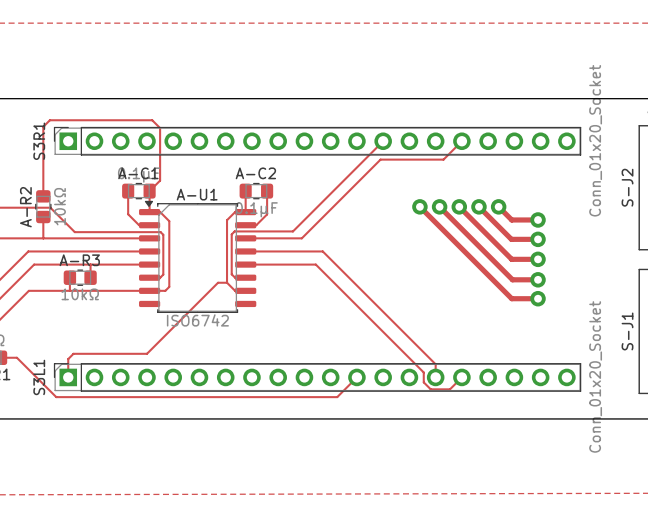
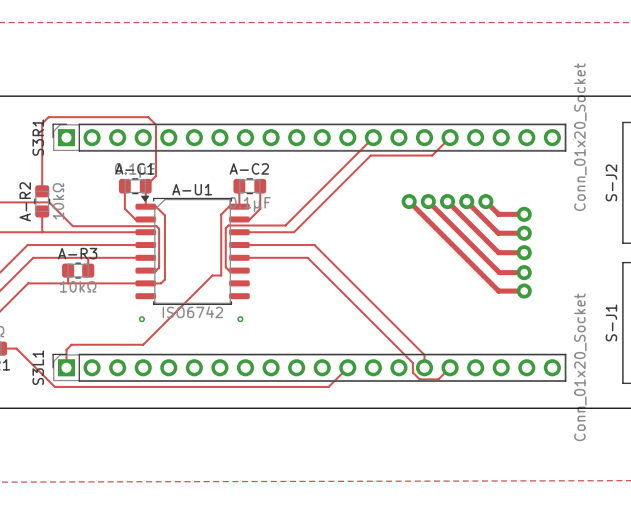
track: (227, 282) (235, 290) (245, 290) -> none
via: none -> (141, 319)
via: none -> (240, 319)

